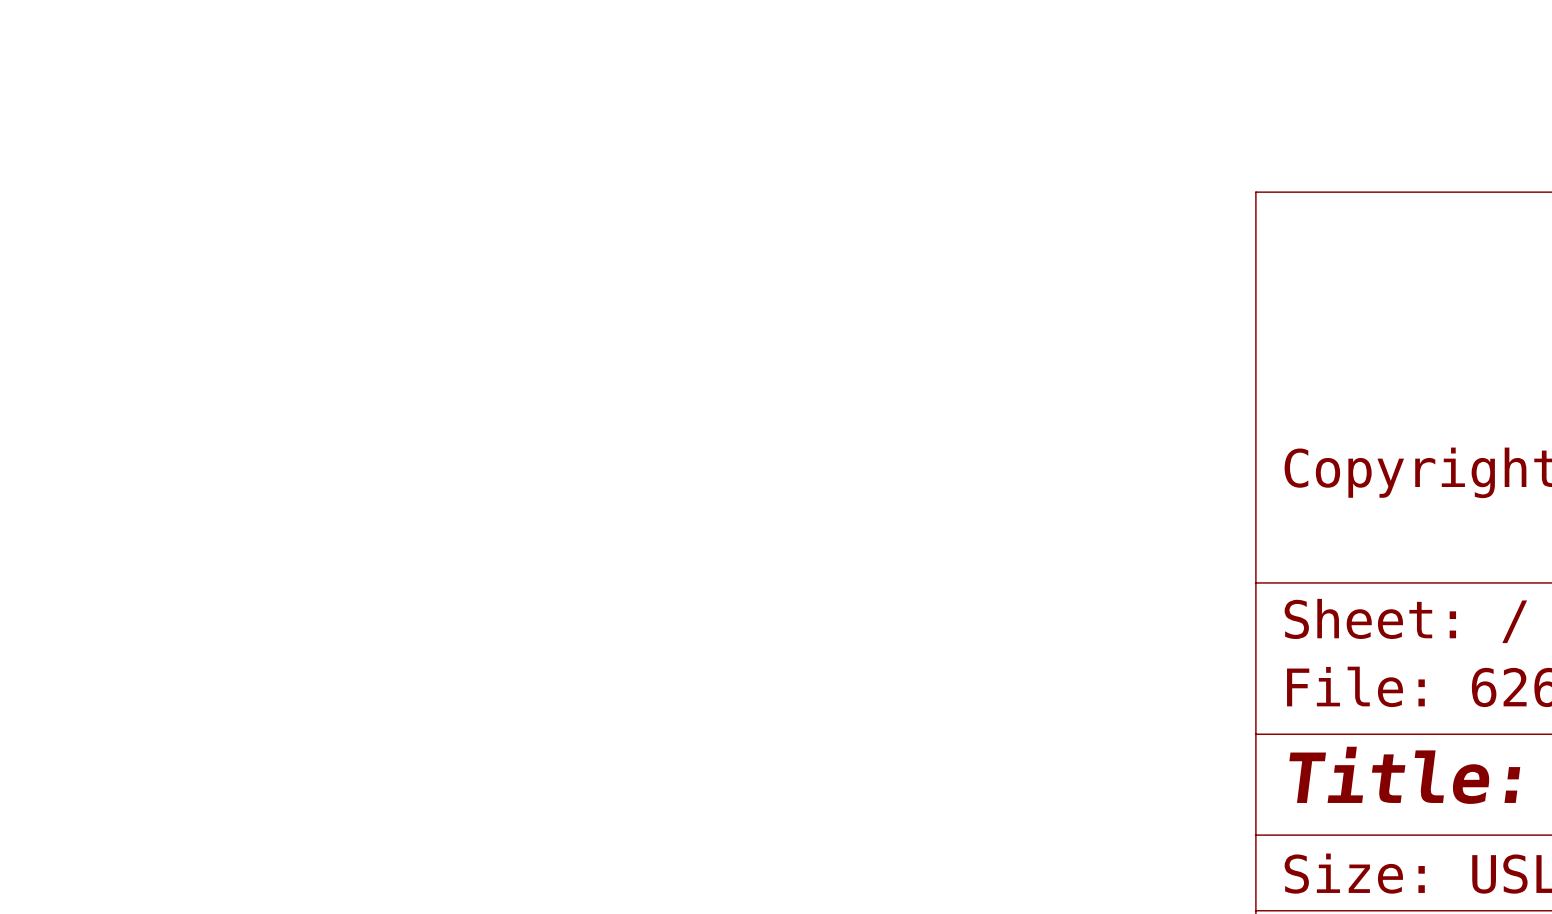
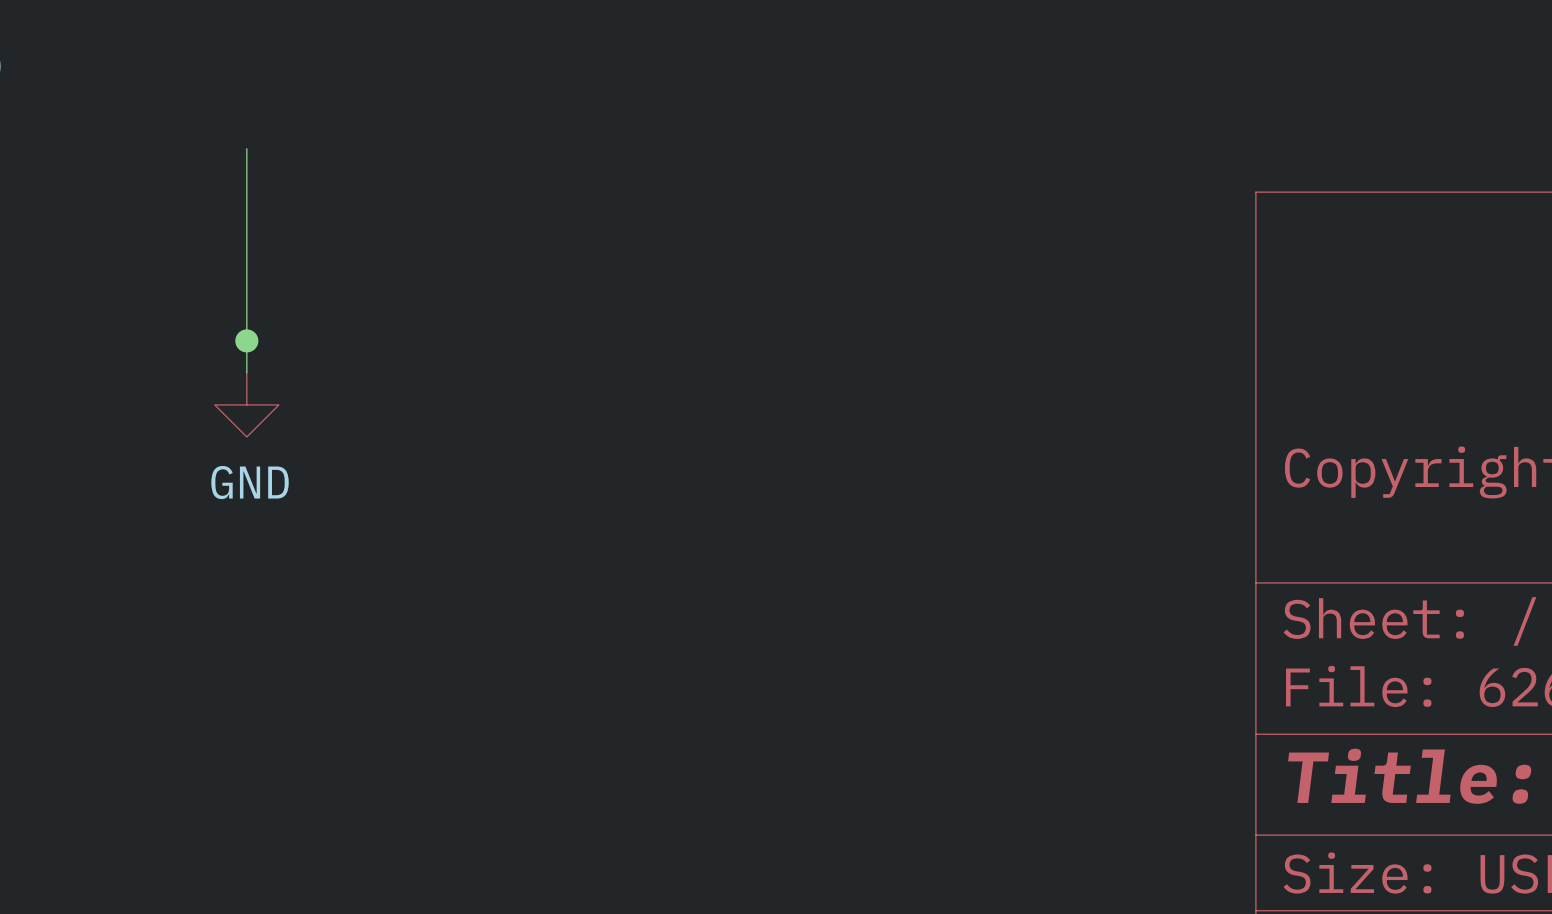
wire: none -> (246, 148) (246, 372)
junction: none -> (246, 340)
power symbol: none -> GND (246, 404)

